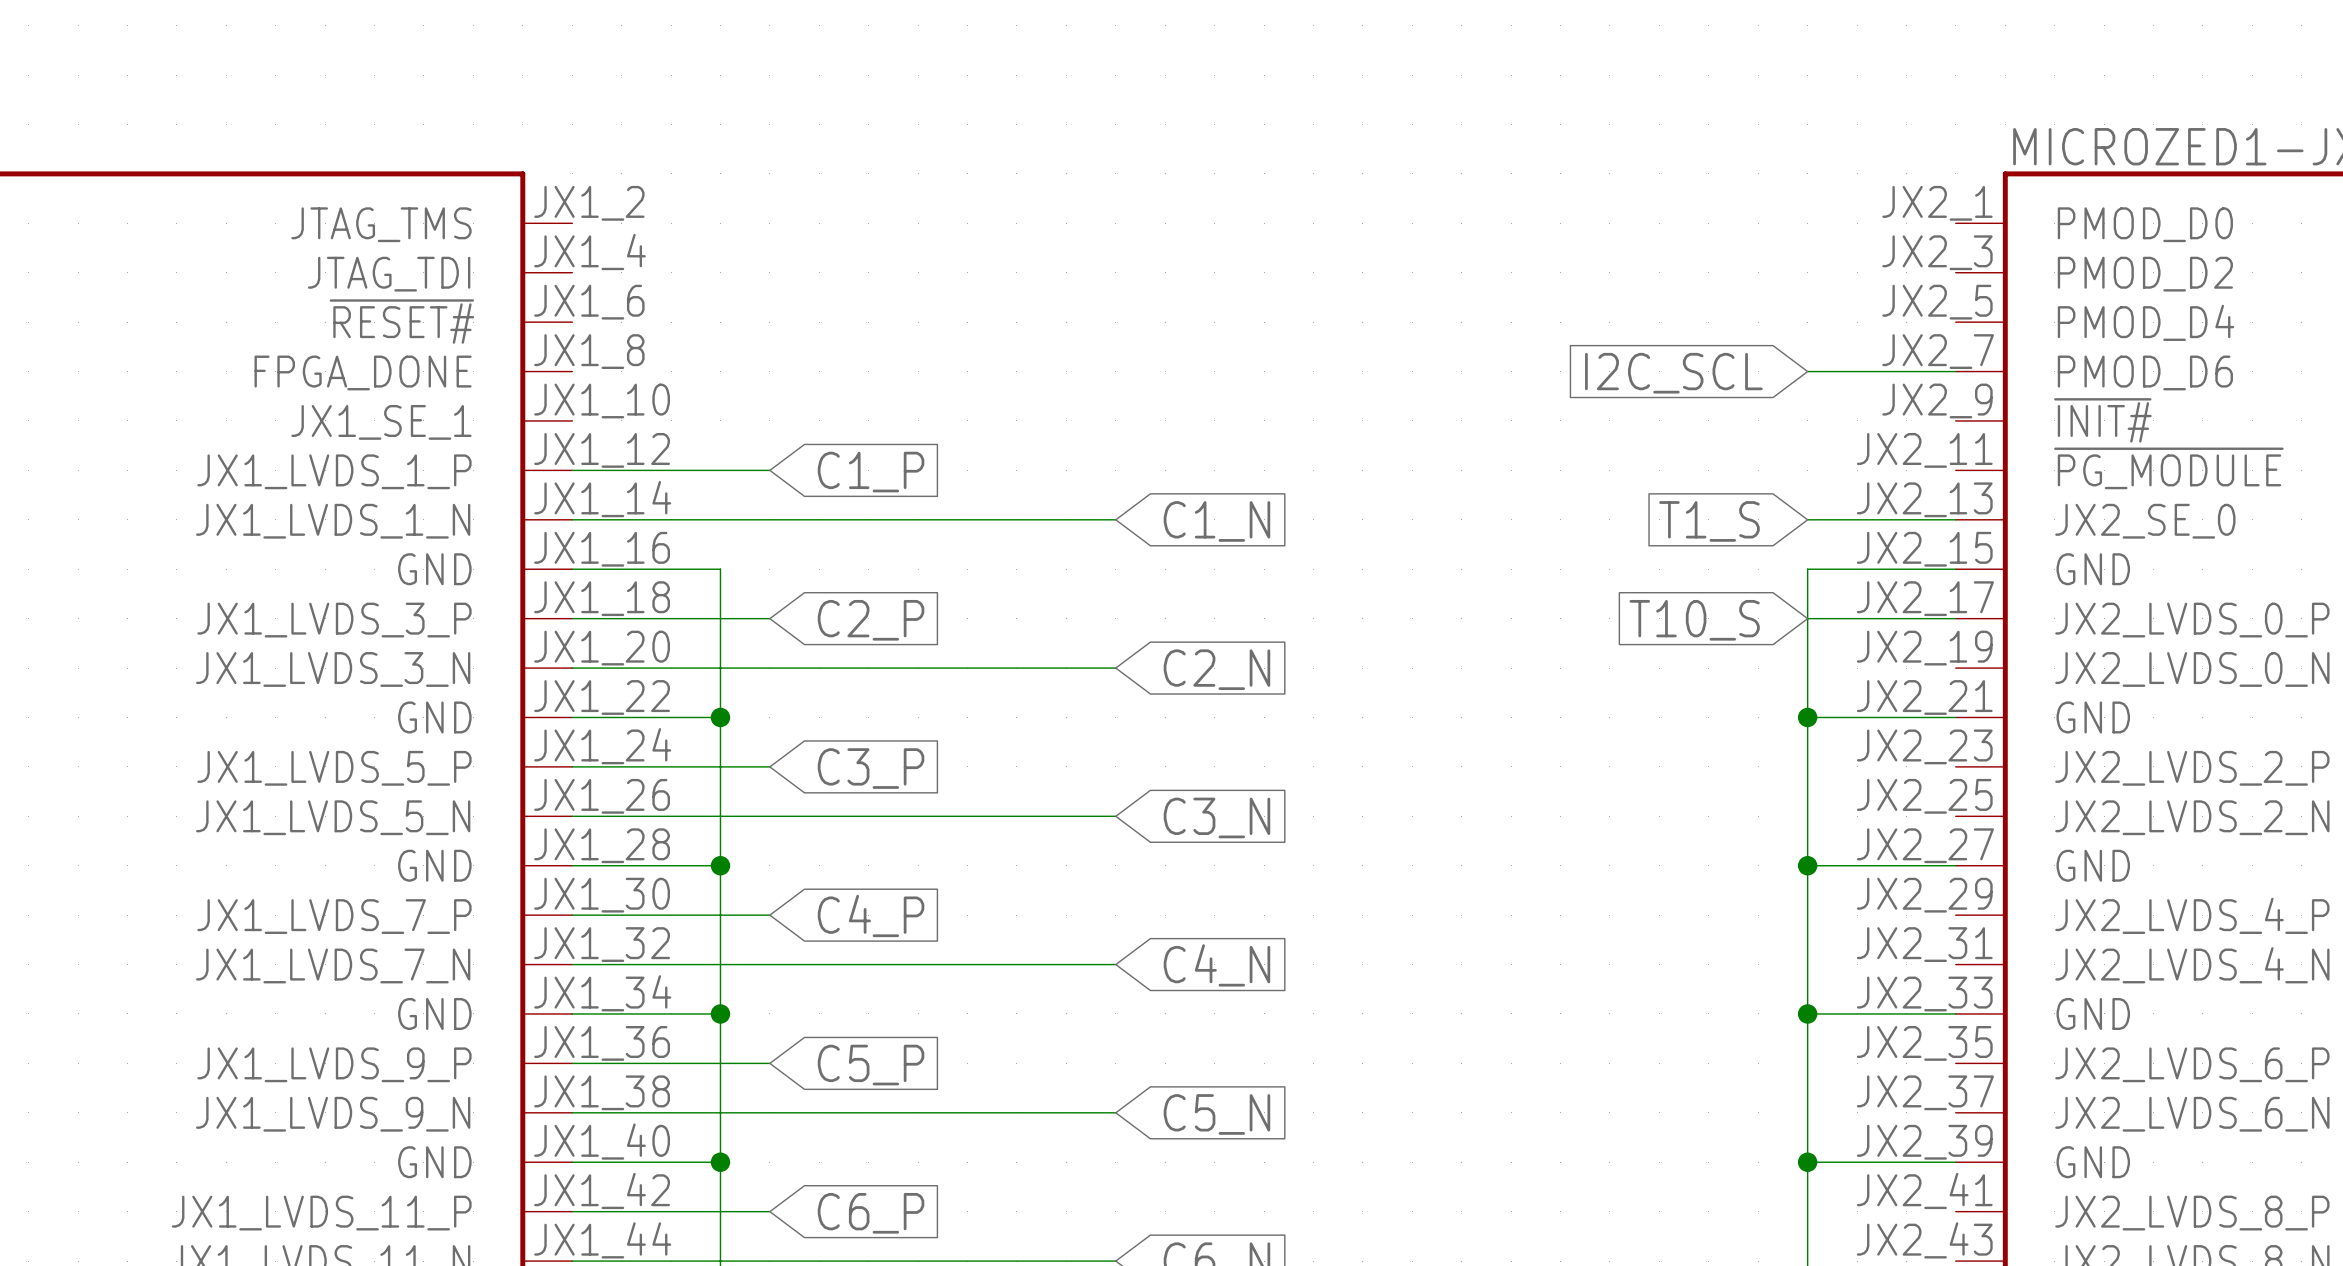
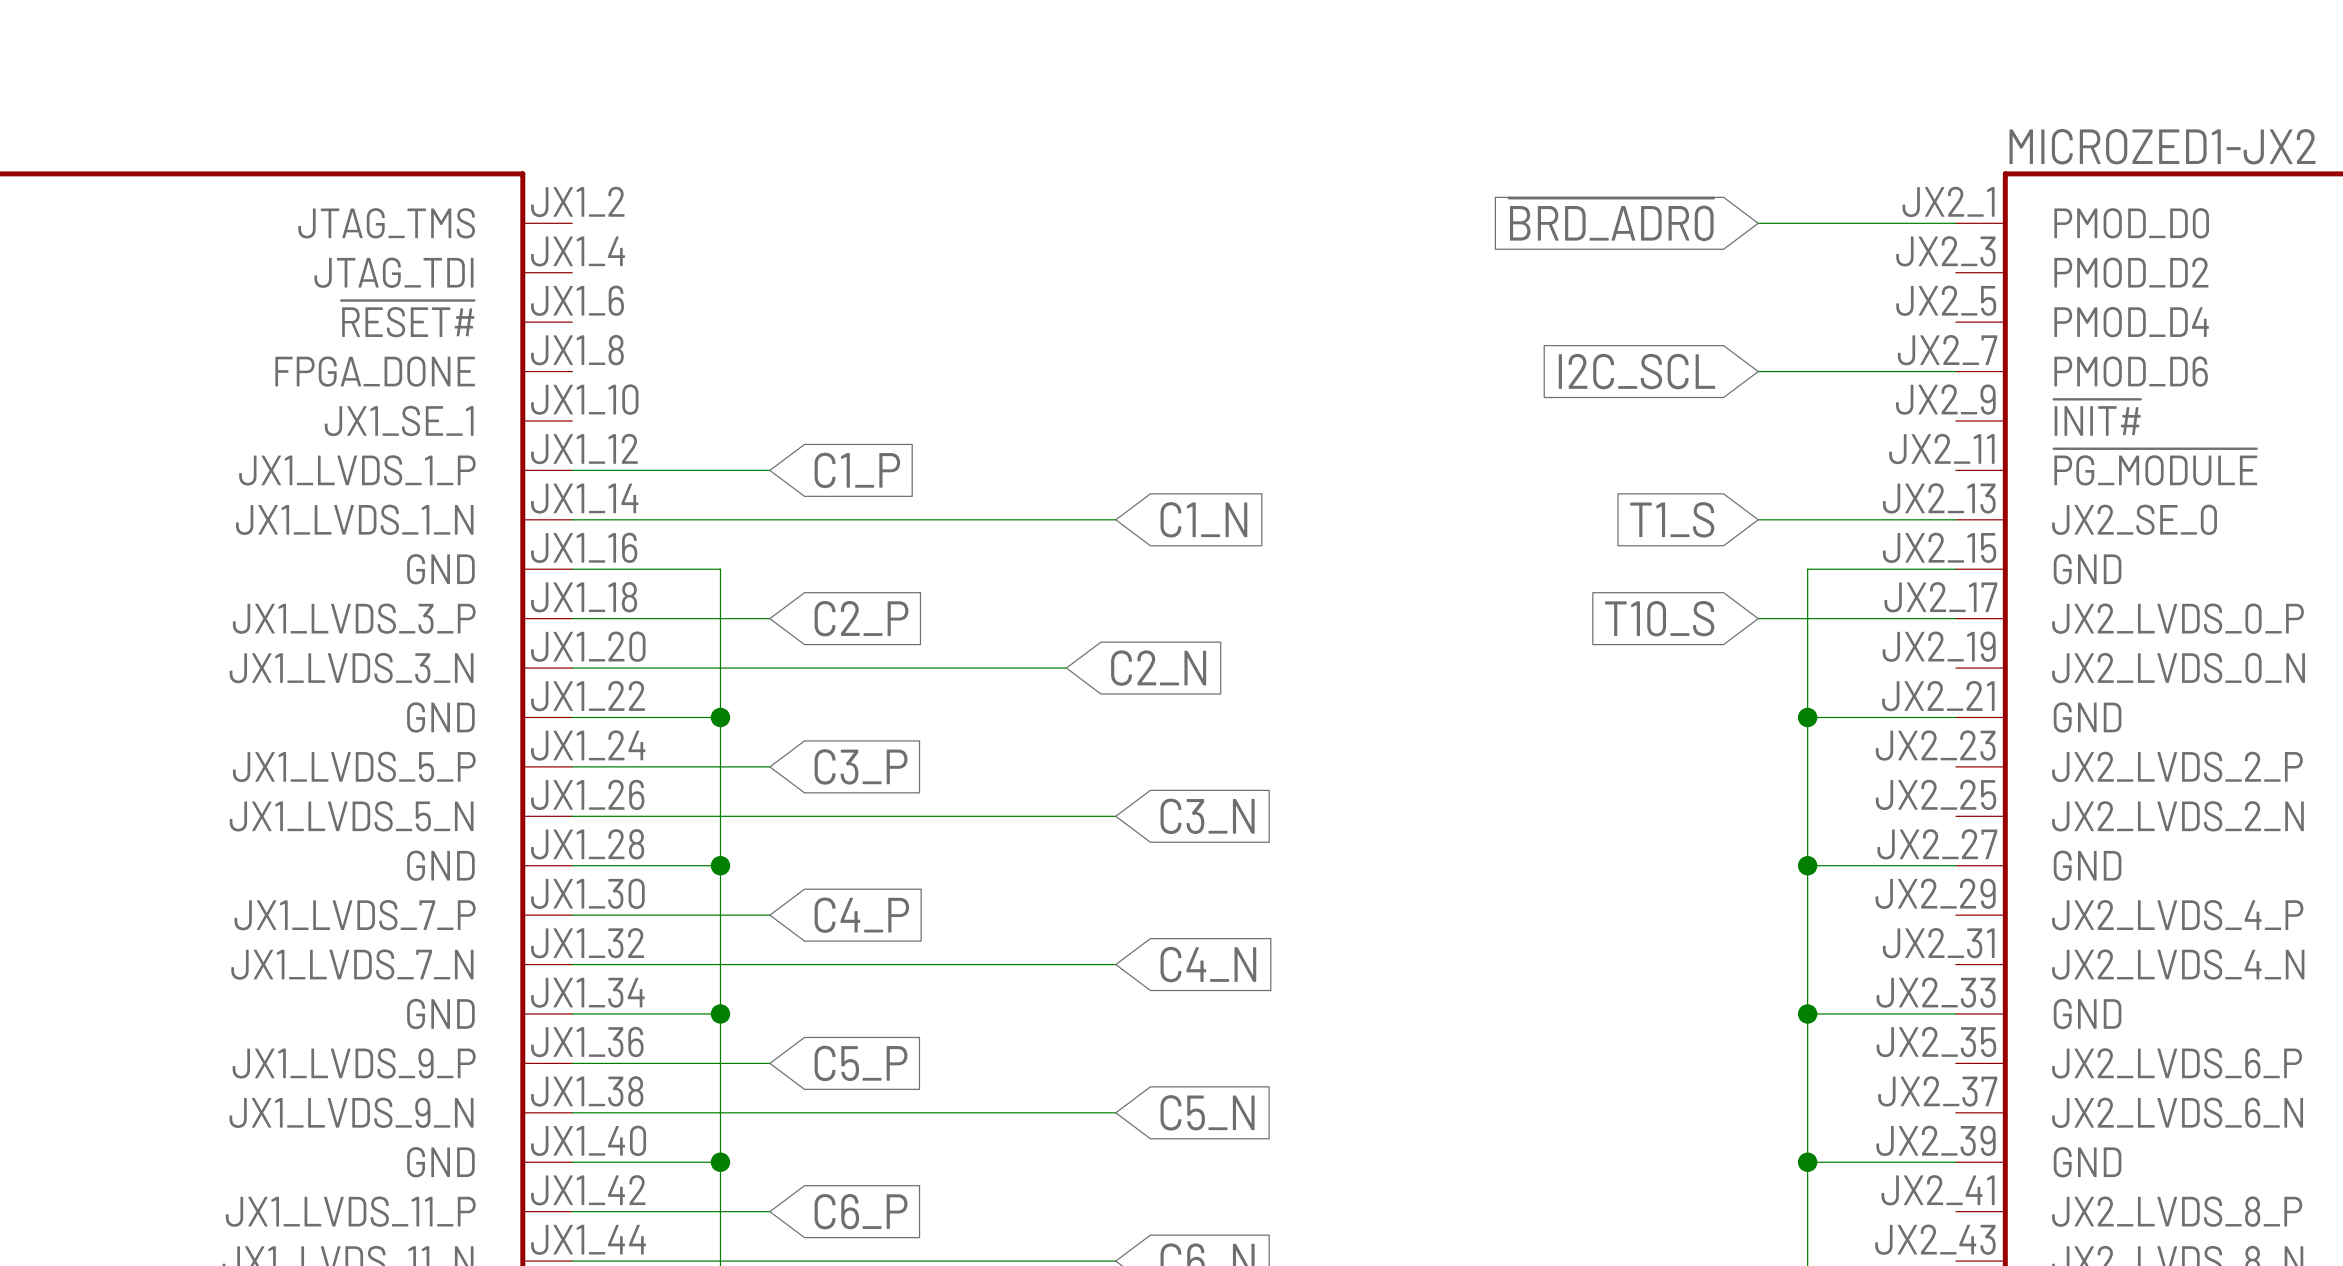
global label: none -> ~{BRD_ADR0} (1611, 219)
wire: none -> (1758, 223) (1955, 223)
wire: none -> (1758, 371) (1807, 371)
global label position: I2C_SCL (1673, 373) -> I2C_SCL (1636, 371)
wire: none -> (1758, 519) (1807, 519)
global label position: T1_S (1709, 521) -> T1_S (1672, 519)
wire: none -> (1758, 618) (1807, 618)
global label position: T10_S (1694, 620) -> T10_S (1659, 618)
wire: (1066, 668) (1115, 668) -> none
global label position: C2_N (1216, 669) -> C2_N (1158, 668)

